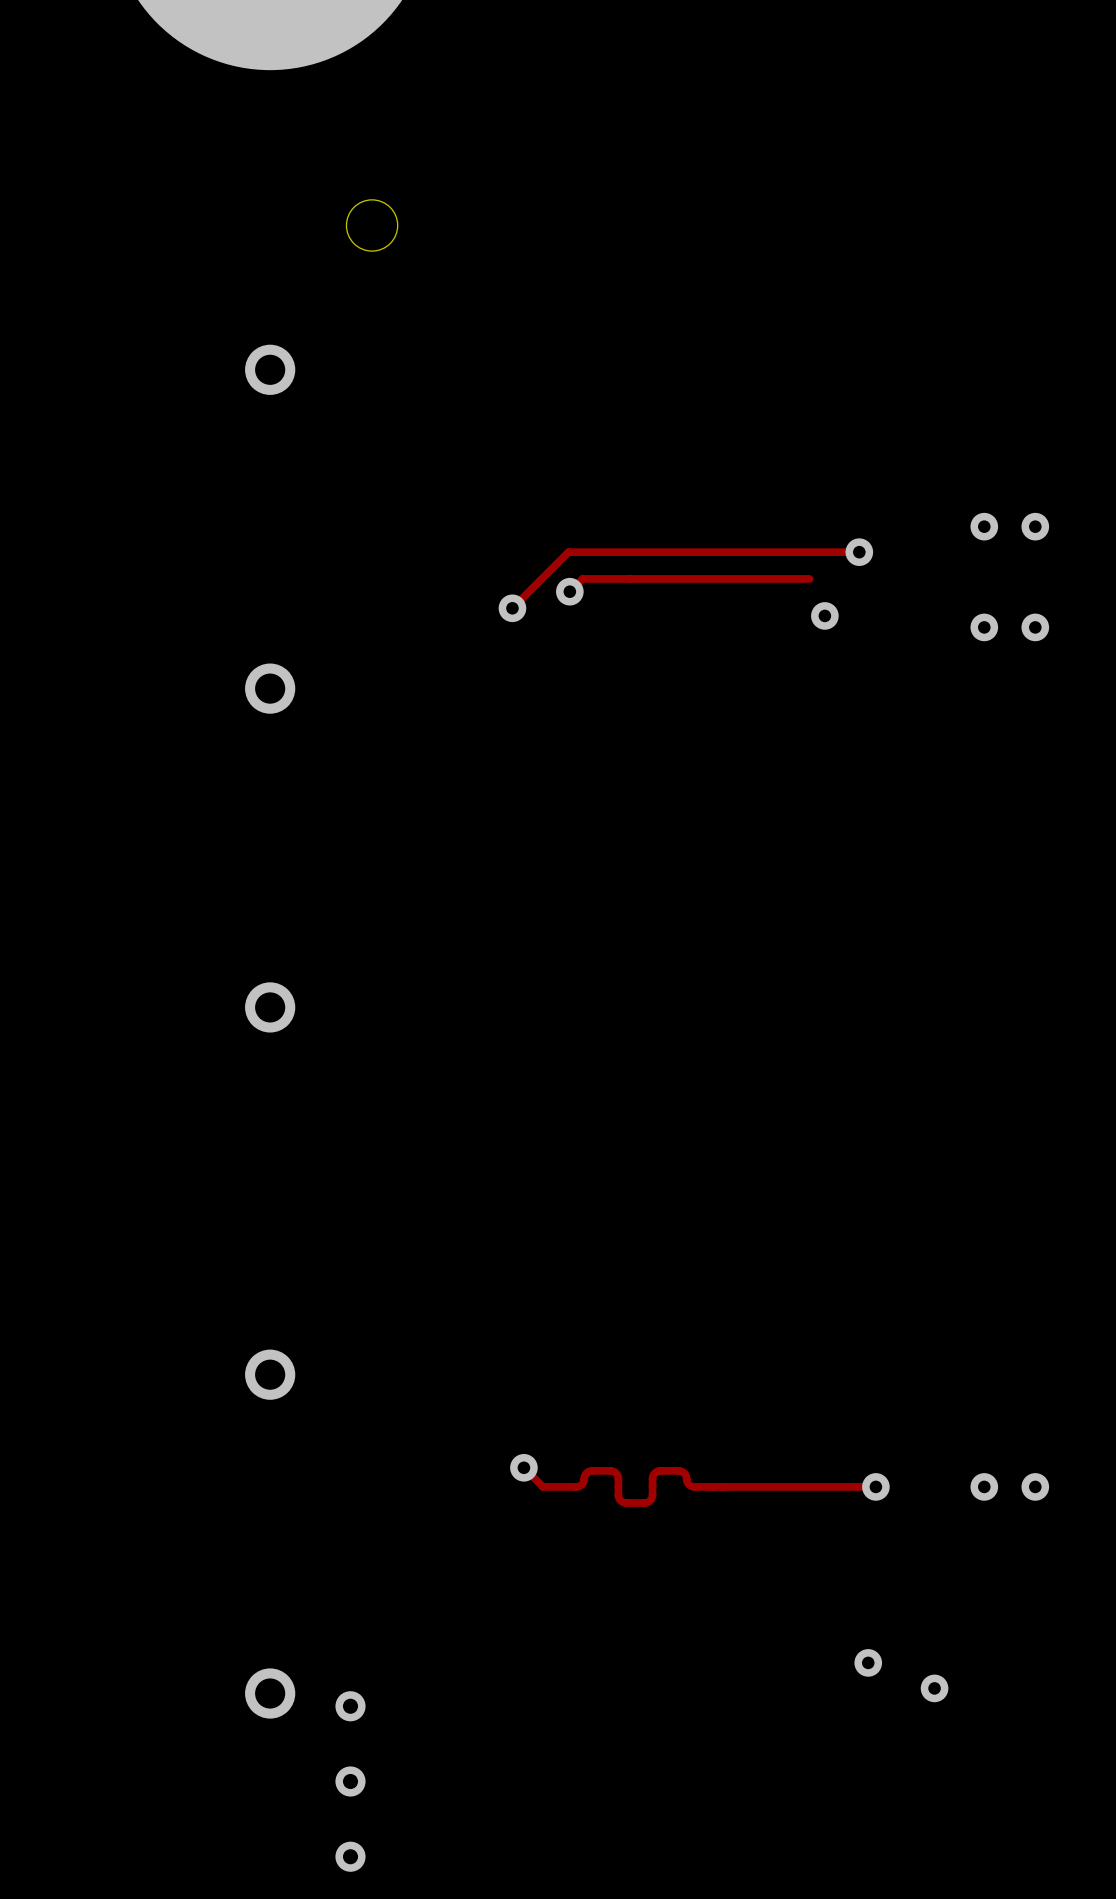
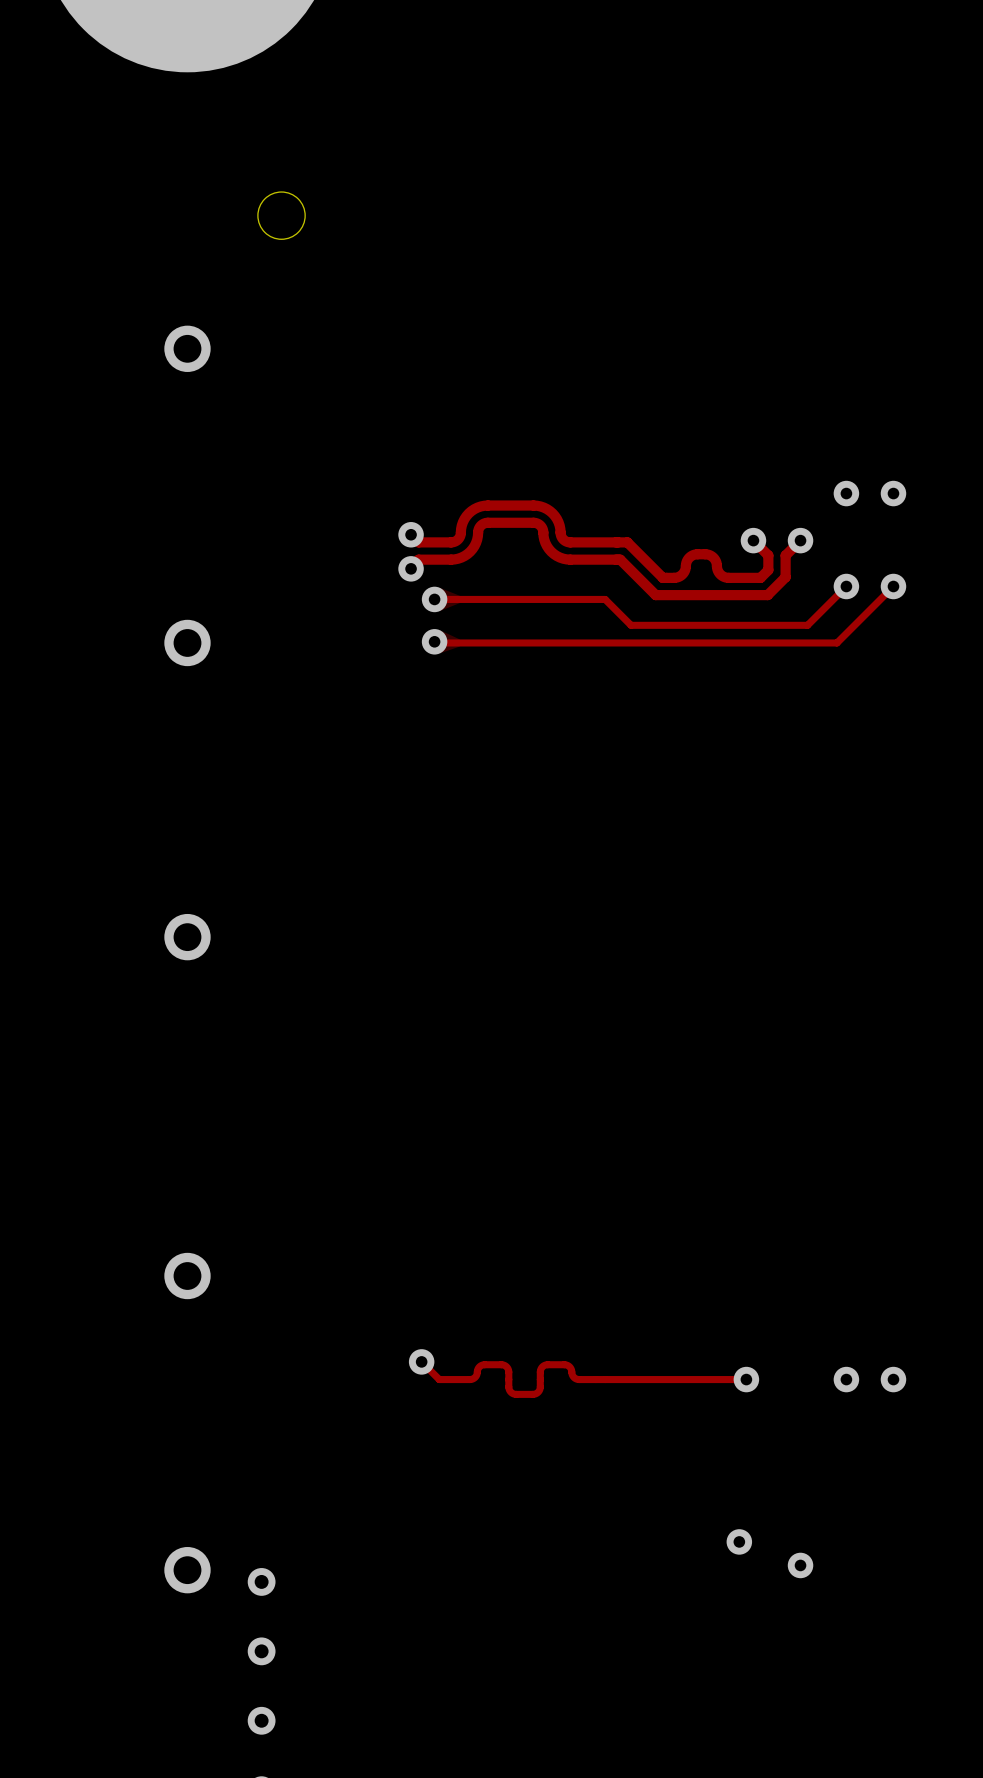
track: (859, 552) (568, 552) (512, 608) -> (800, 540) (785, 555) (785, 577) (767, 595) (655, 595) (620, 559) (570, 559) (556, 556) (546, 546) (541, 527) (534, 522) (484, 523) (479, 528) (474, 546) (464, 556) (454, 559) (418, 559) (411, 567)
via position: (859, 552) -> (753, 540)
track: none -> (411, 534) (418, 542) (453, 542) (459, 536) (461, 525) (466, 516) (477, 507) (487, 505) (537, 505) (547, 509) (554, 516) (559, 525) (561, 535) (565, 540) (627, 542) (662, 577) (675, 577) (681, 575) (684, 570) (688, 558) (697, 554) (712, 556) (716, 561) (718, 571) (724, 576) (760, 577) (768, 570) (768, 555) (753, 540)
via: none -> (411, 534)
via: none -> (800, 540)
track: (809, 578) (582, 578) (569, 591) -> none
via: (569, 591) -> none
via: (824, 615) -> none
track: none -> (846, 586) (807, 625) (631, 625) (605, 599) (434, 599)
track: none -> (893, 586) (836, 642) (434, 641)
via: none -> (434, 599)
via: none -> (434, 641)

